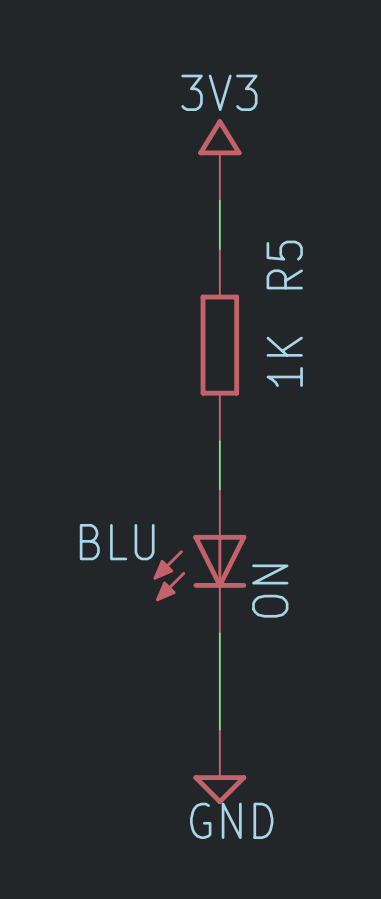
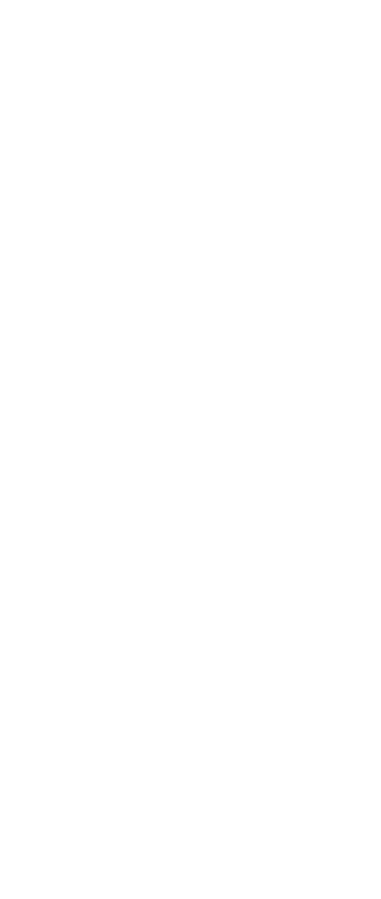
power symbol: 3V3 (219, 160) -> none
wire: (219, 200) (219, 248) -> none
R5: 1K (219, 345) -> none
wire: (219, 441) (219, 489) -> none
ON: BLU (199, 561) -> none
wire: (219, 633) (219, 729) -> none
power symbol: GND (219, 766) -> none

